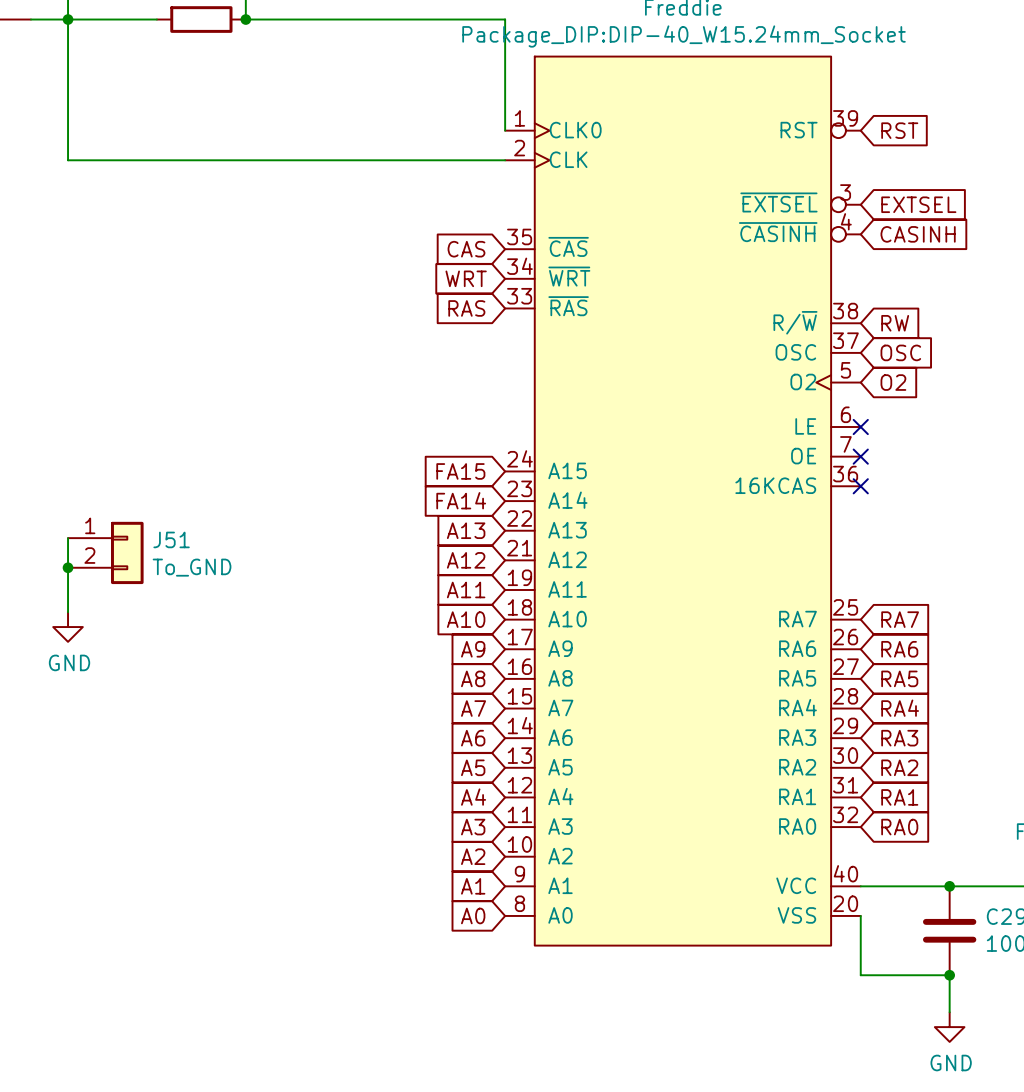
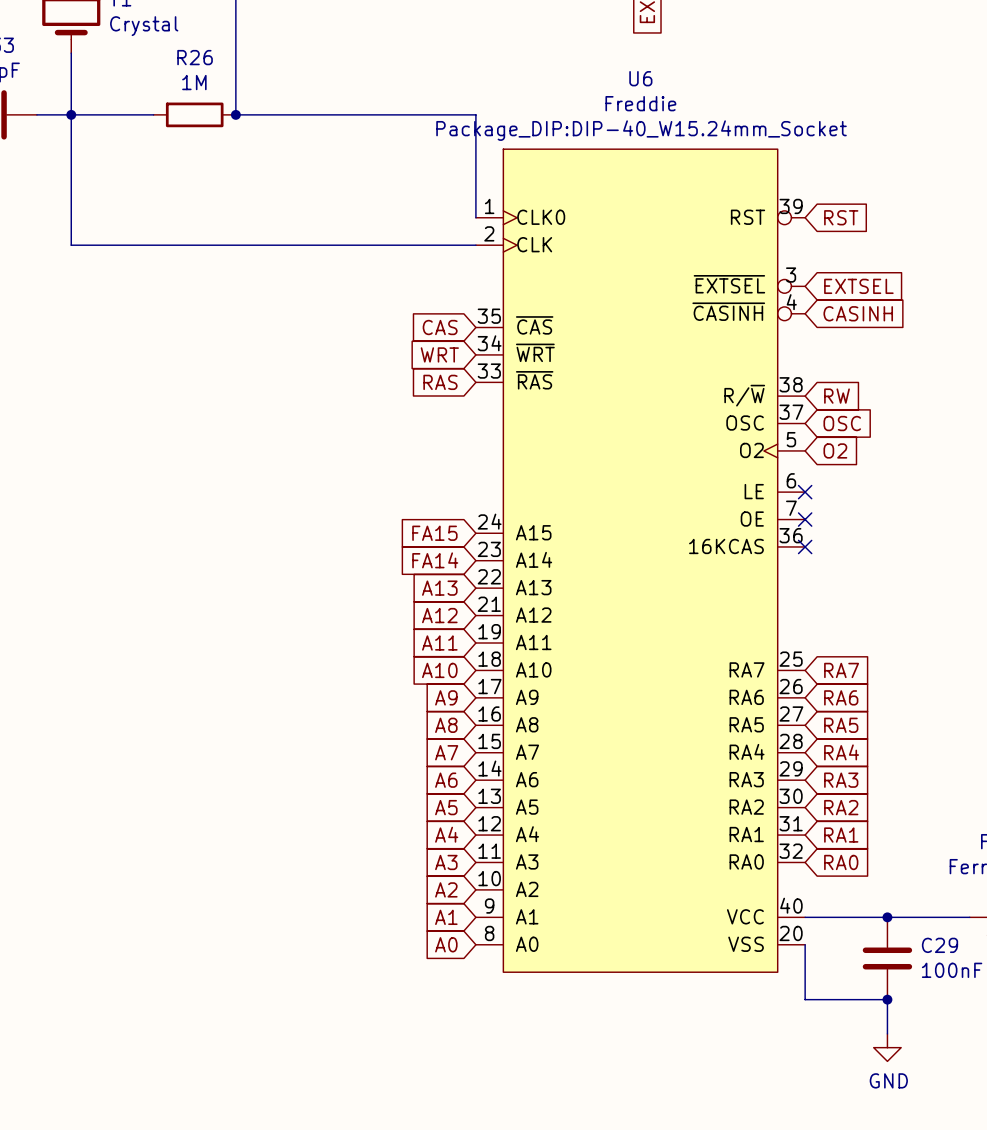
wire: (68, 538) (68, 612) -> none
J51: To_GND (105, 552) -> none
junction: (68, 567) -> none
power symbol: GND (68, 627) -> none

